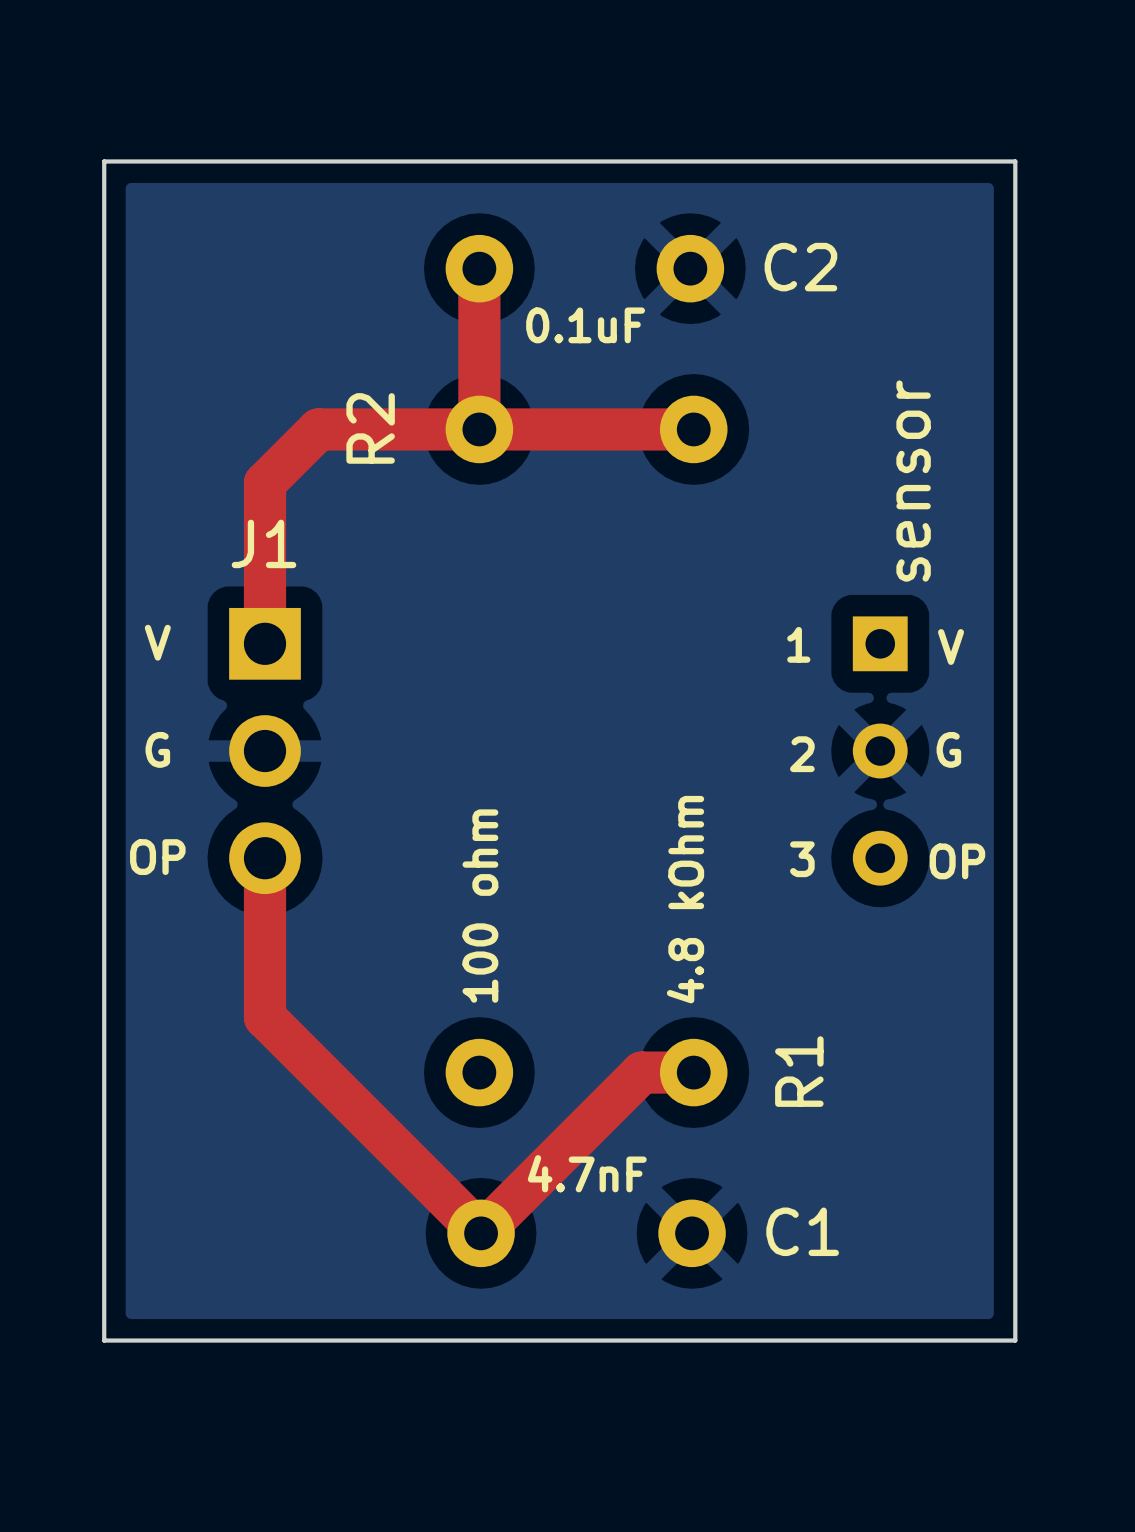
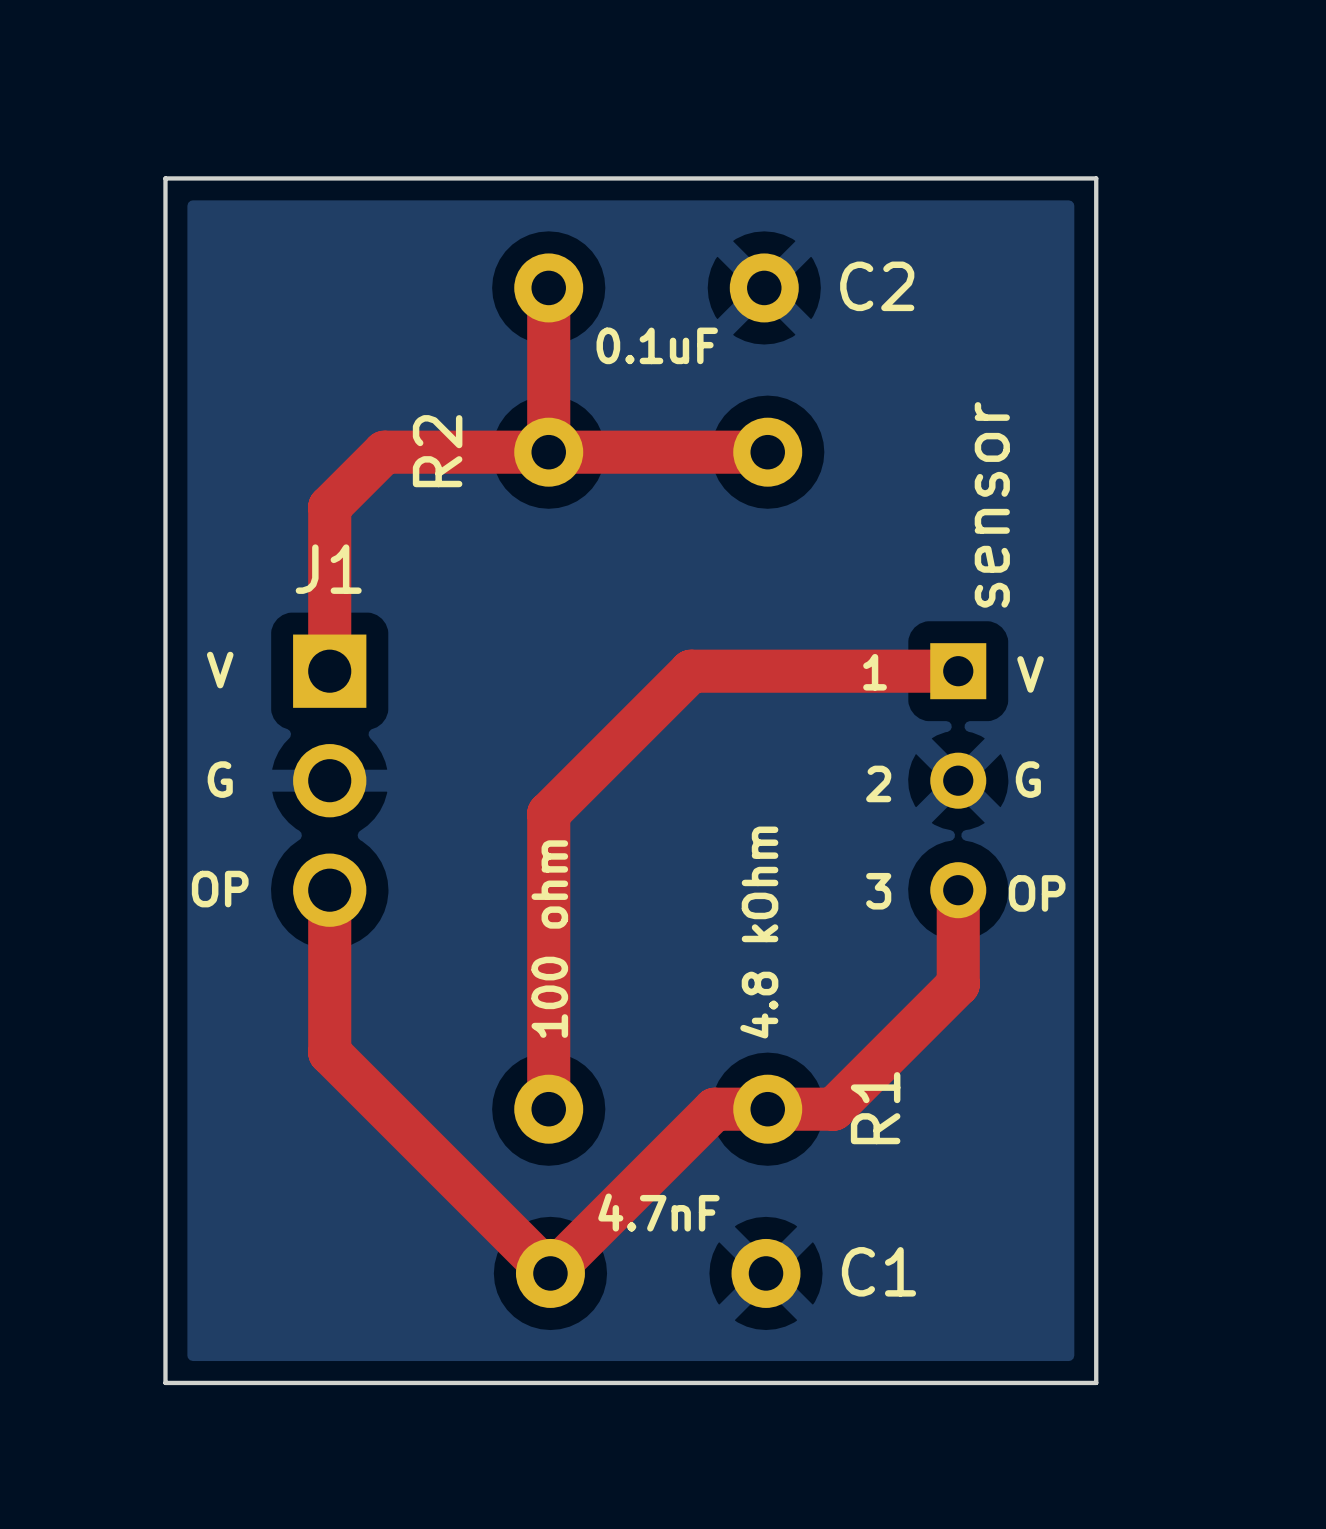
top track: none -> (958, 671) (691, 671) (548, 813) (548, 1109)
top track: none -> (958, 890) (958, 984) (833, 1109) (767, 1109)

